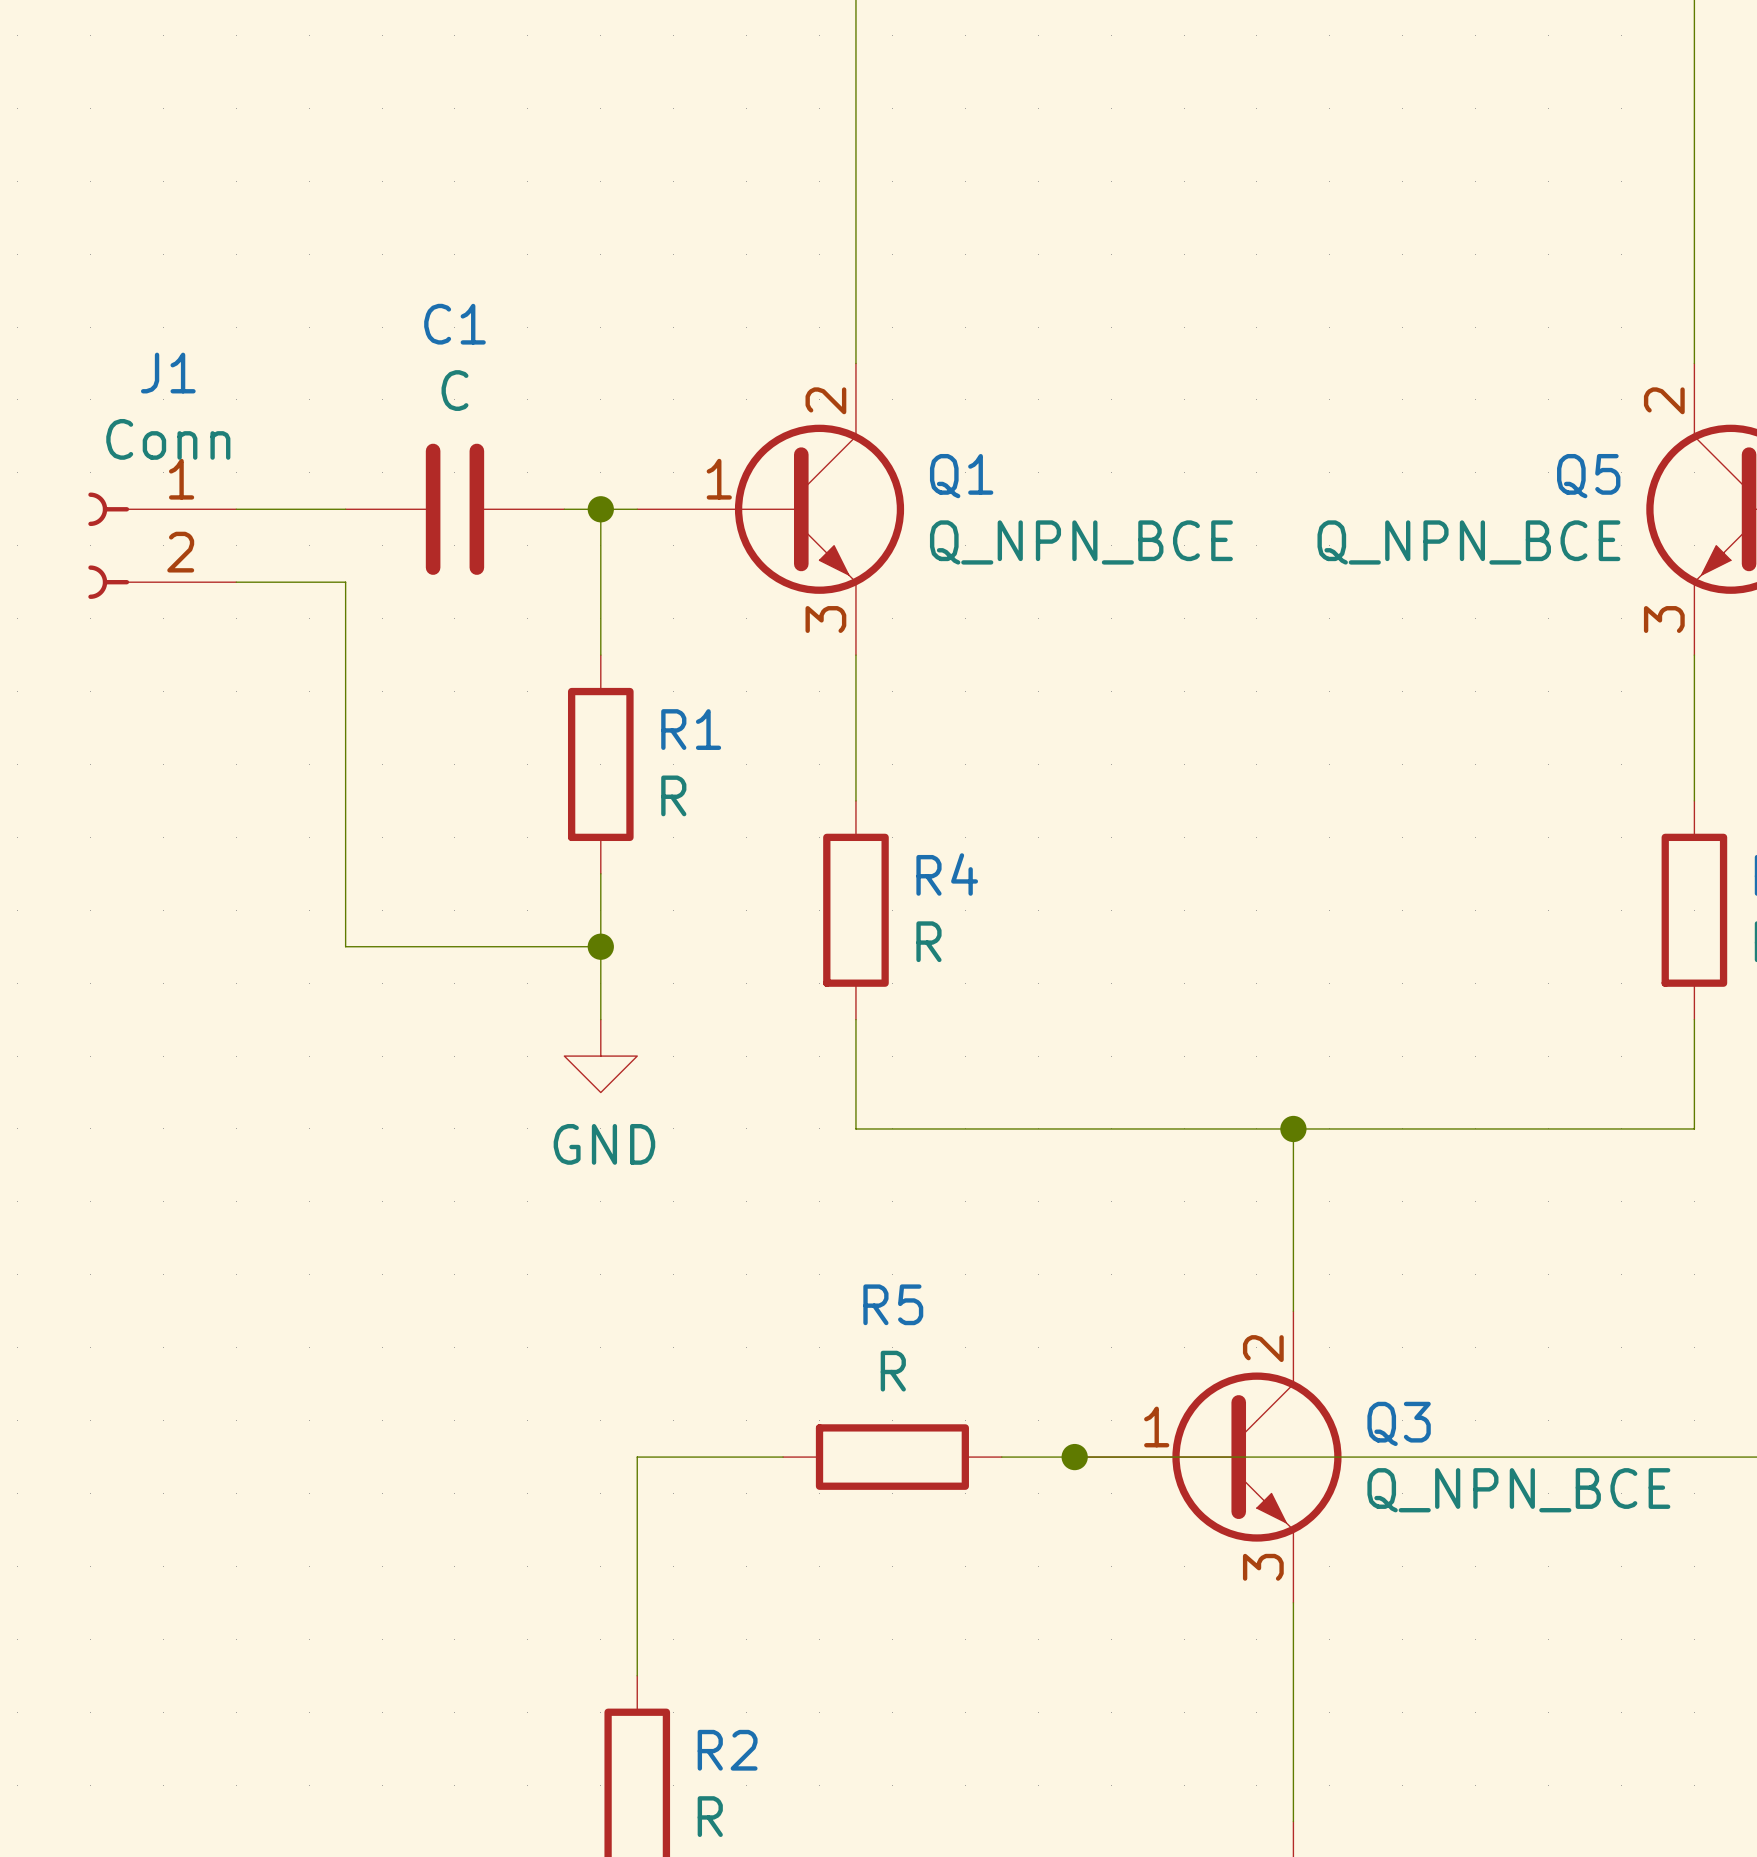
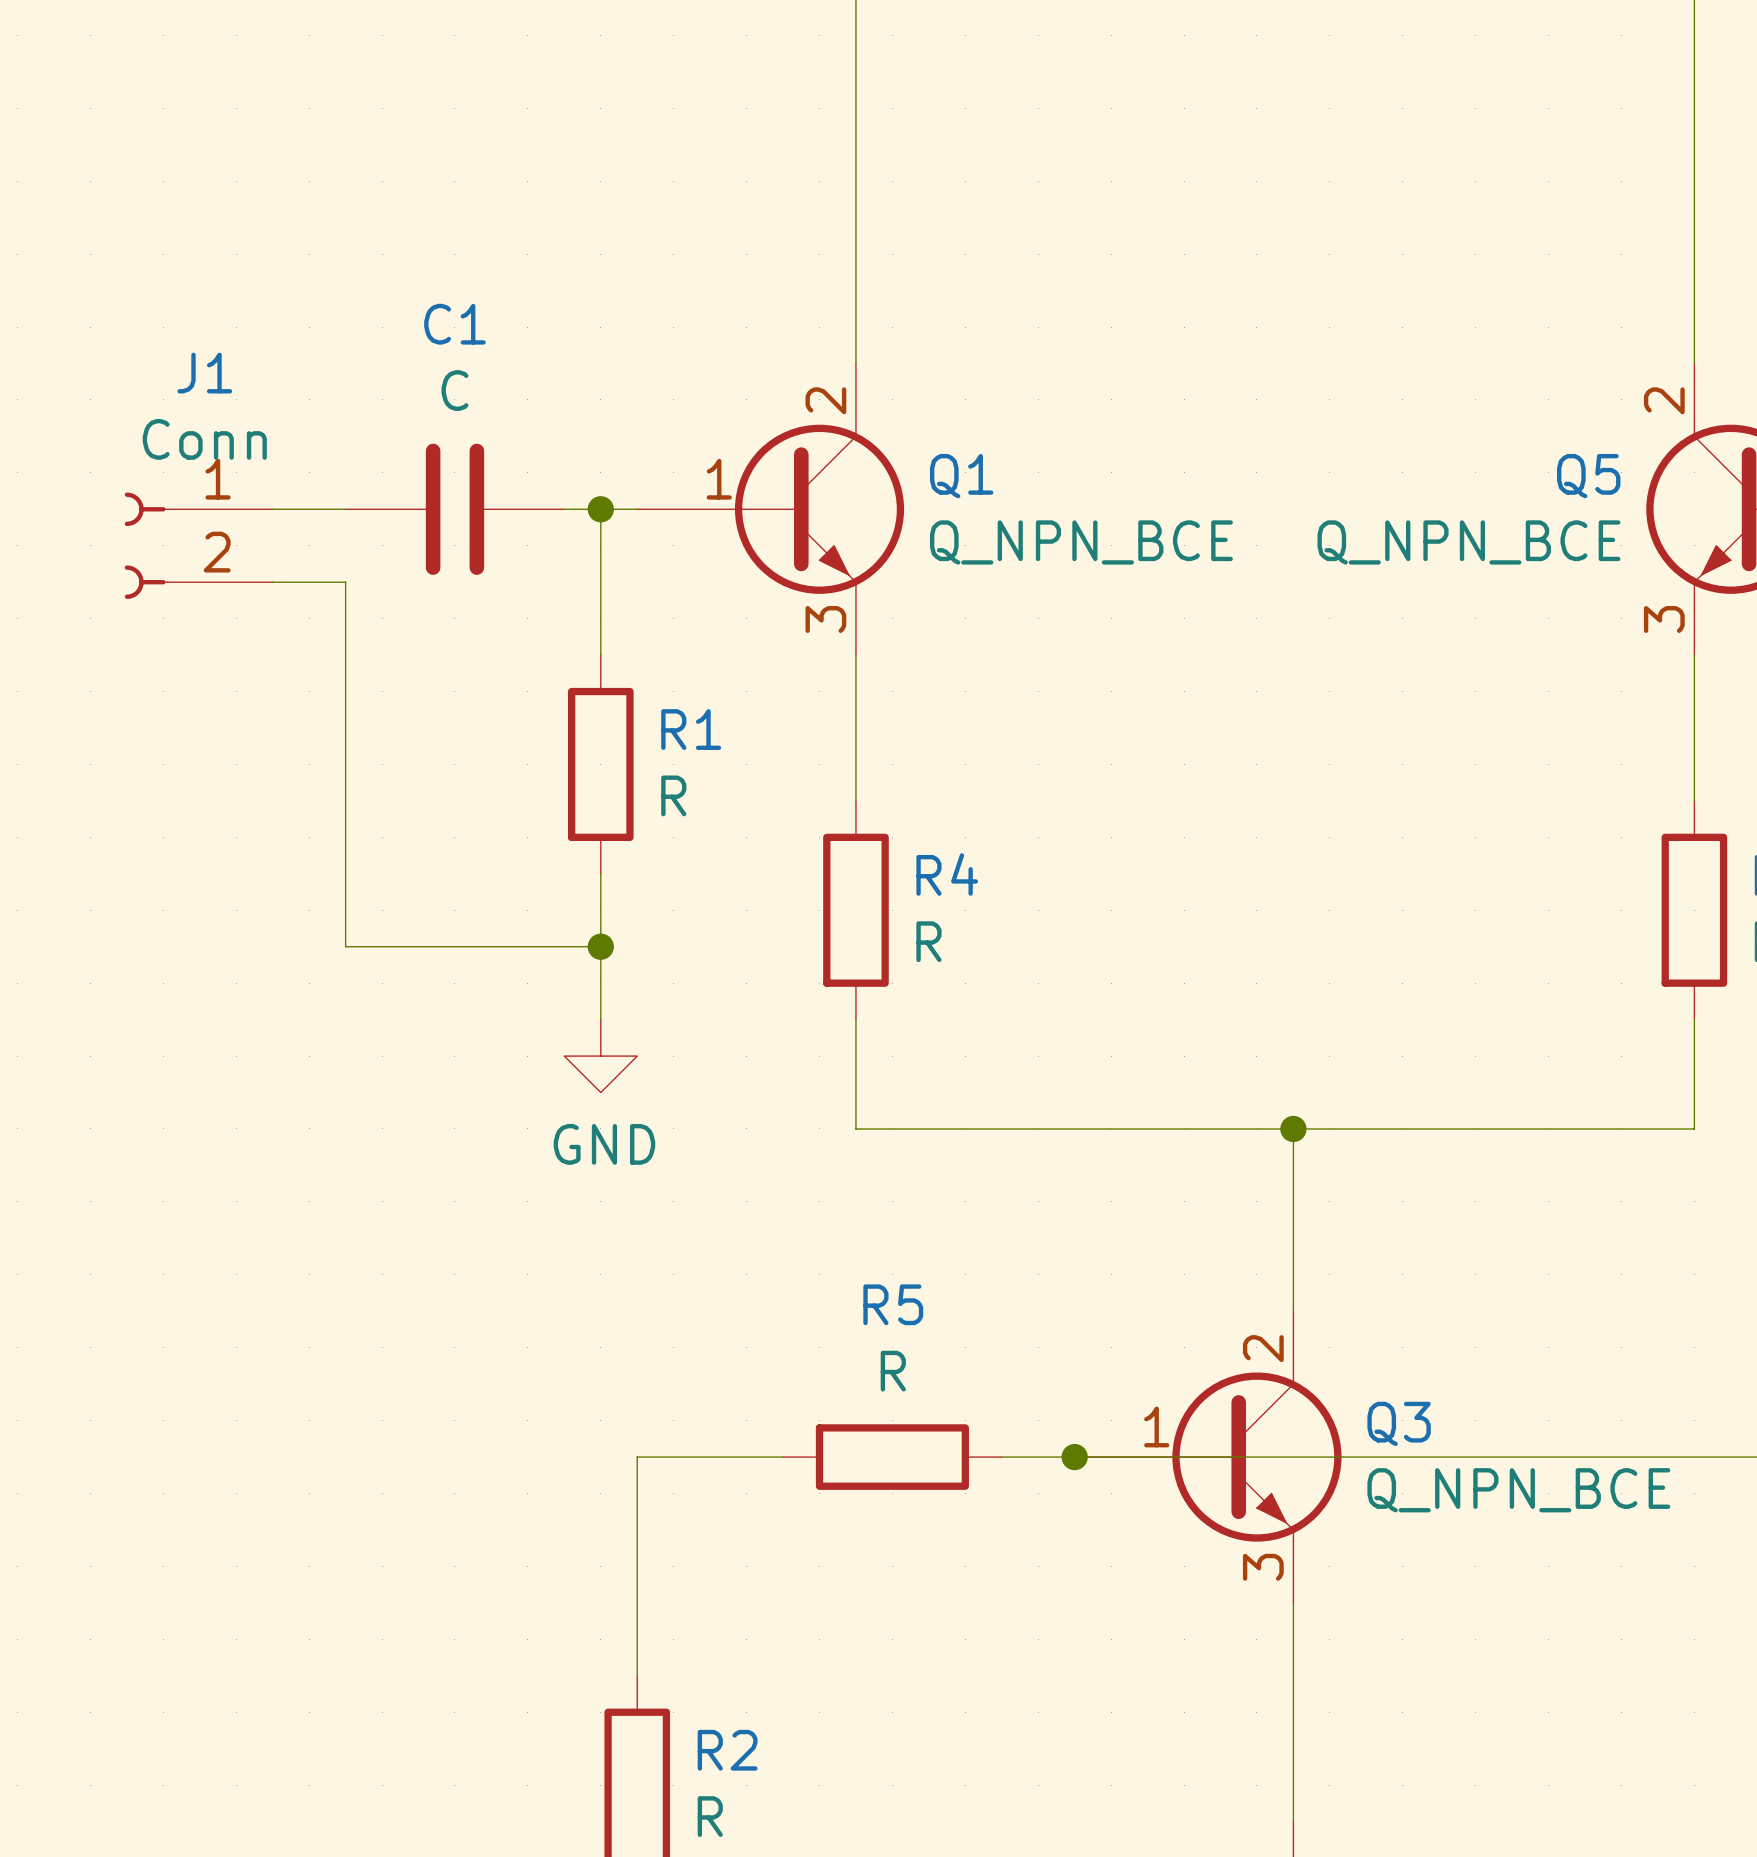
J1 position: (162, 545) -> (198, 545)

